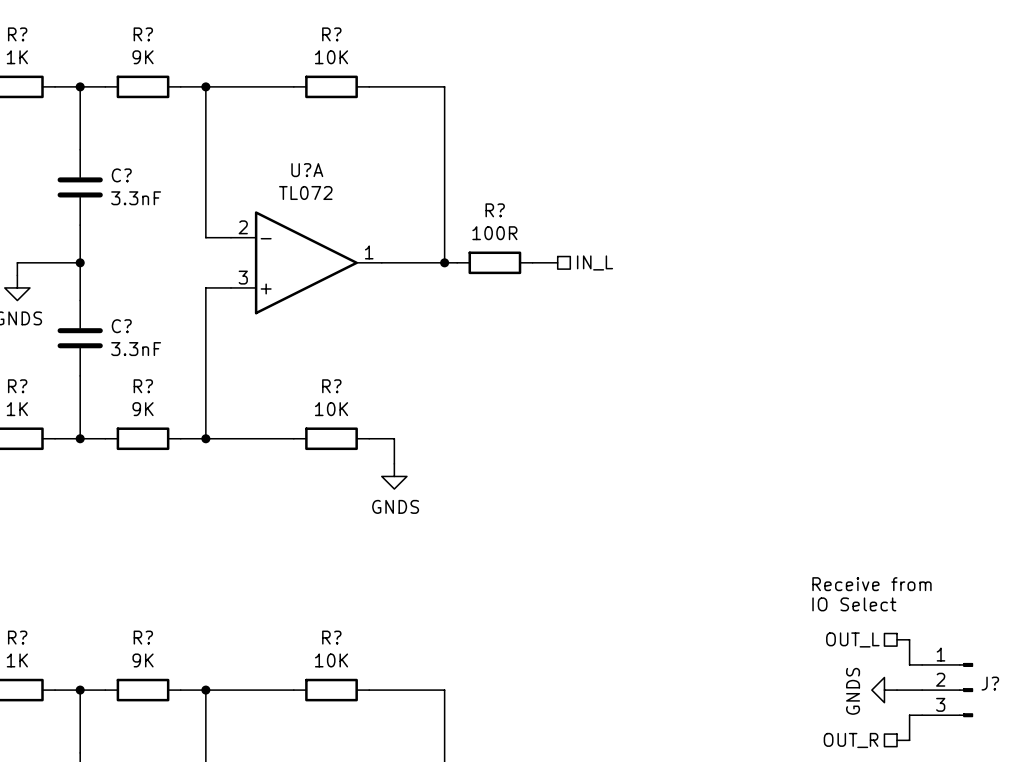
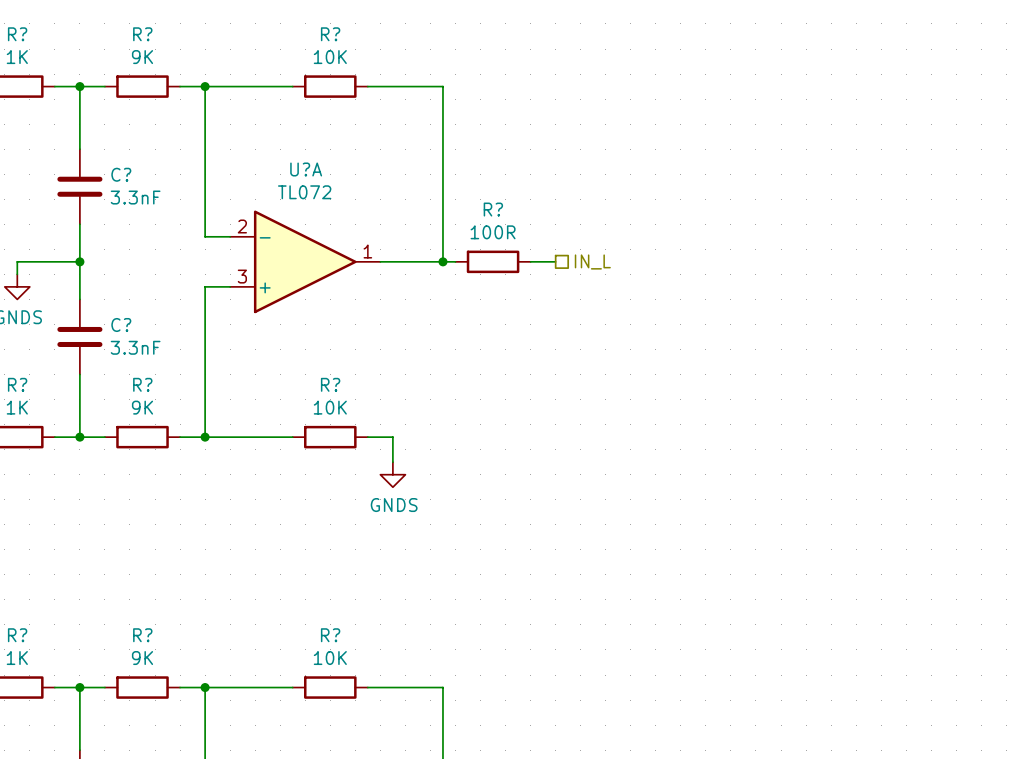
text: Receive from (871, 584) -> none
text: IO Select (854, 604) -> none
hierarchical label: OUT_L (852, 639) -> none
wire: (897, 639) (909, 639) (909, 664) (922, 664) -> none
power symbol: GNDS (884, 690) -> none
wire: (897, 690) (922, 690) -> none
J?: (947, 690) -> none
wire: (922, 715) (909, 715) (909, 740) (897, 740) -> none
hierarchical label: OUT_R (851, 740) -> none

